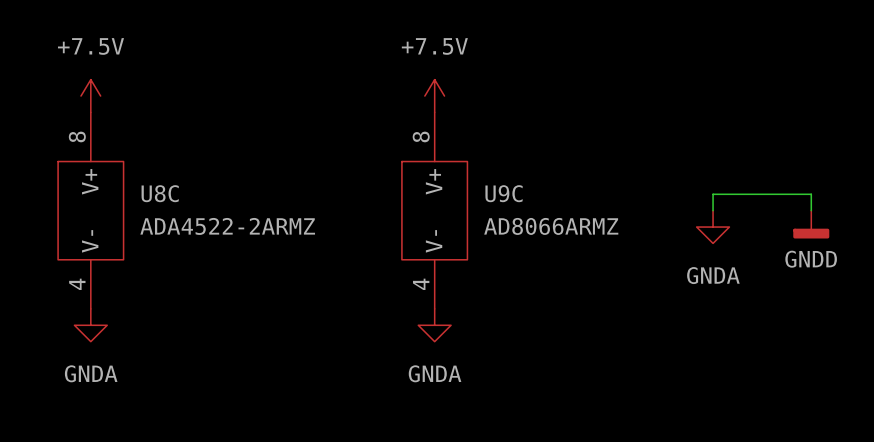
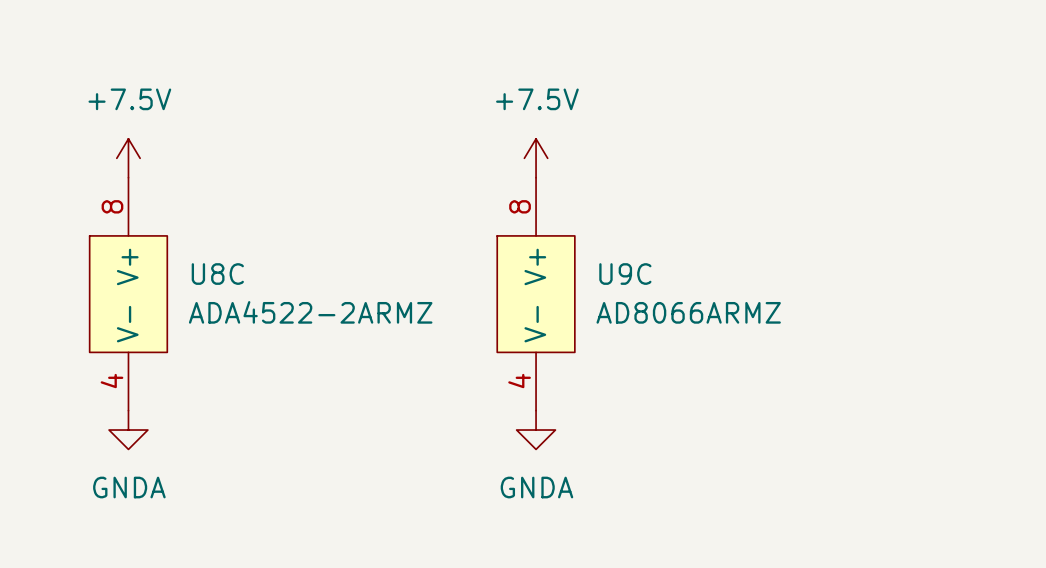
wire: (713, 210) (713, 194) (811, 194) (811, 210) -> none
power symbol: GNDD (811, 224) -> none
power symbol: GNDA (713, 227) -> none

